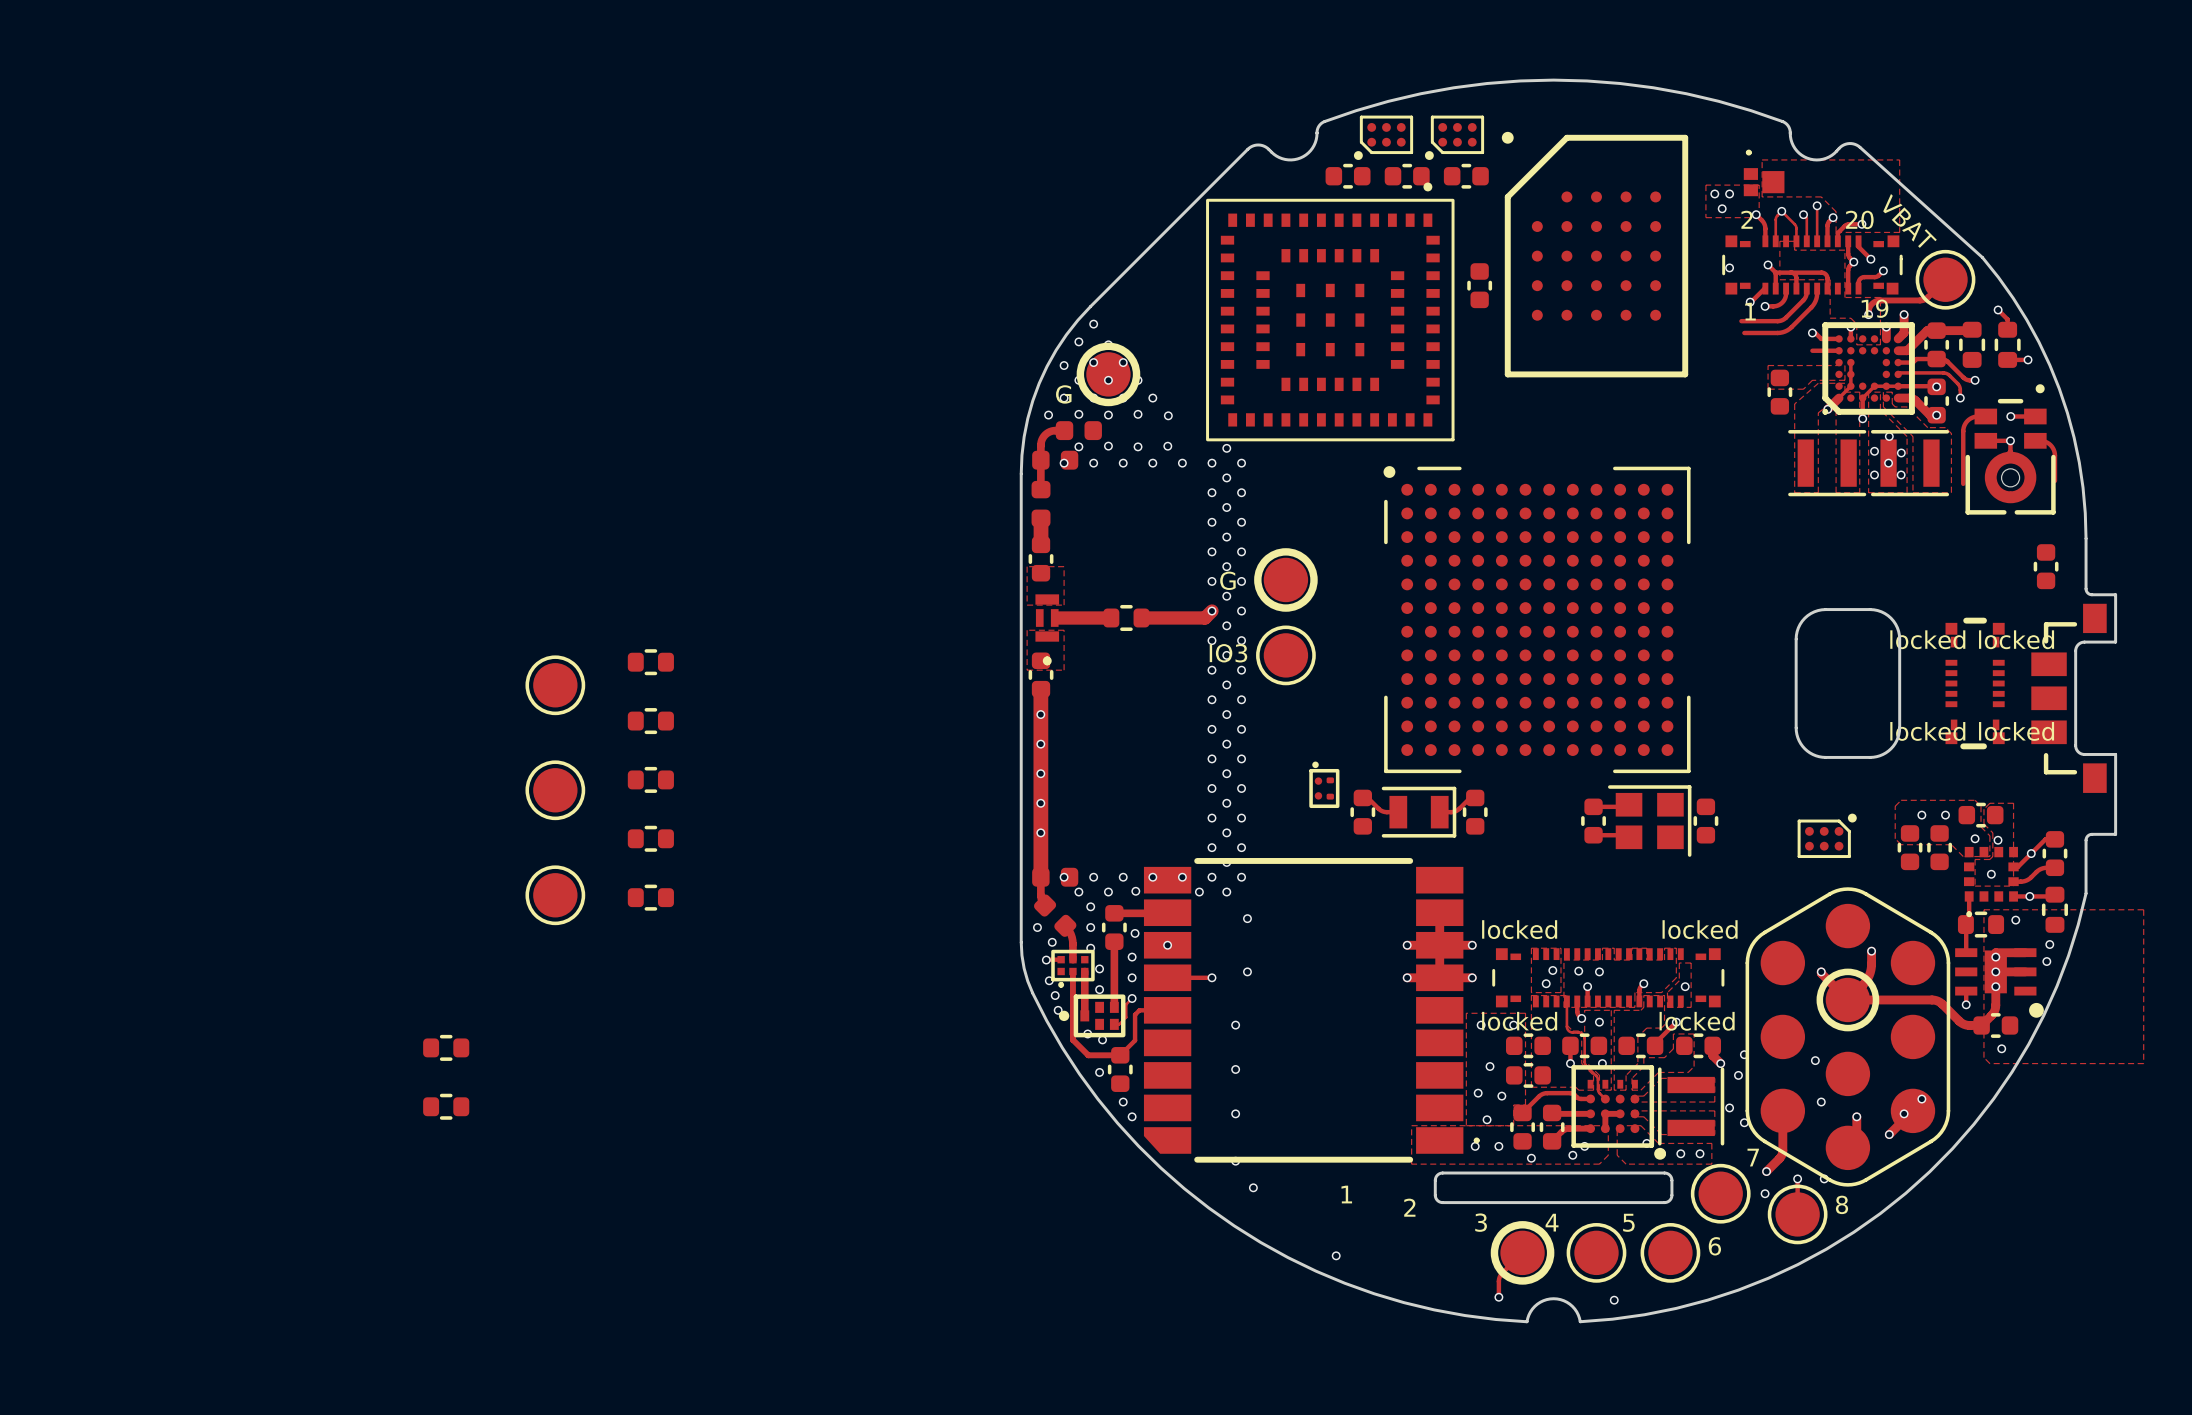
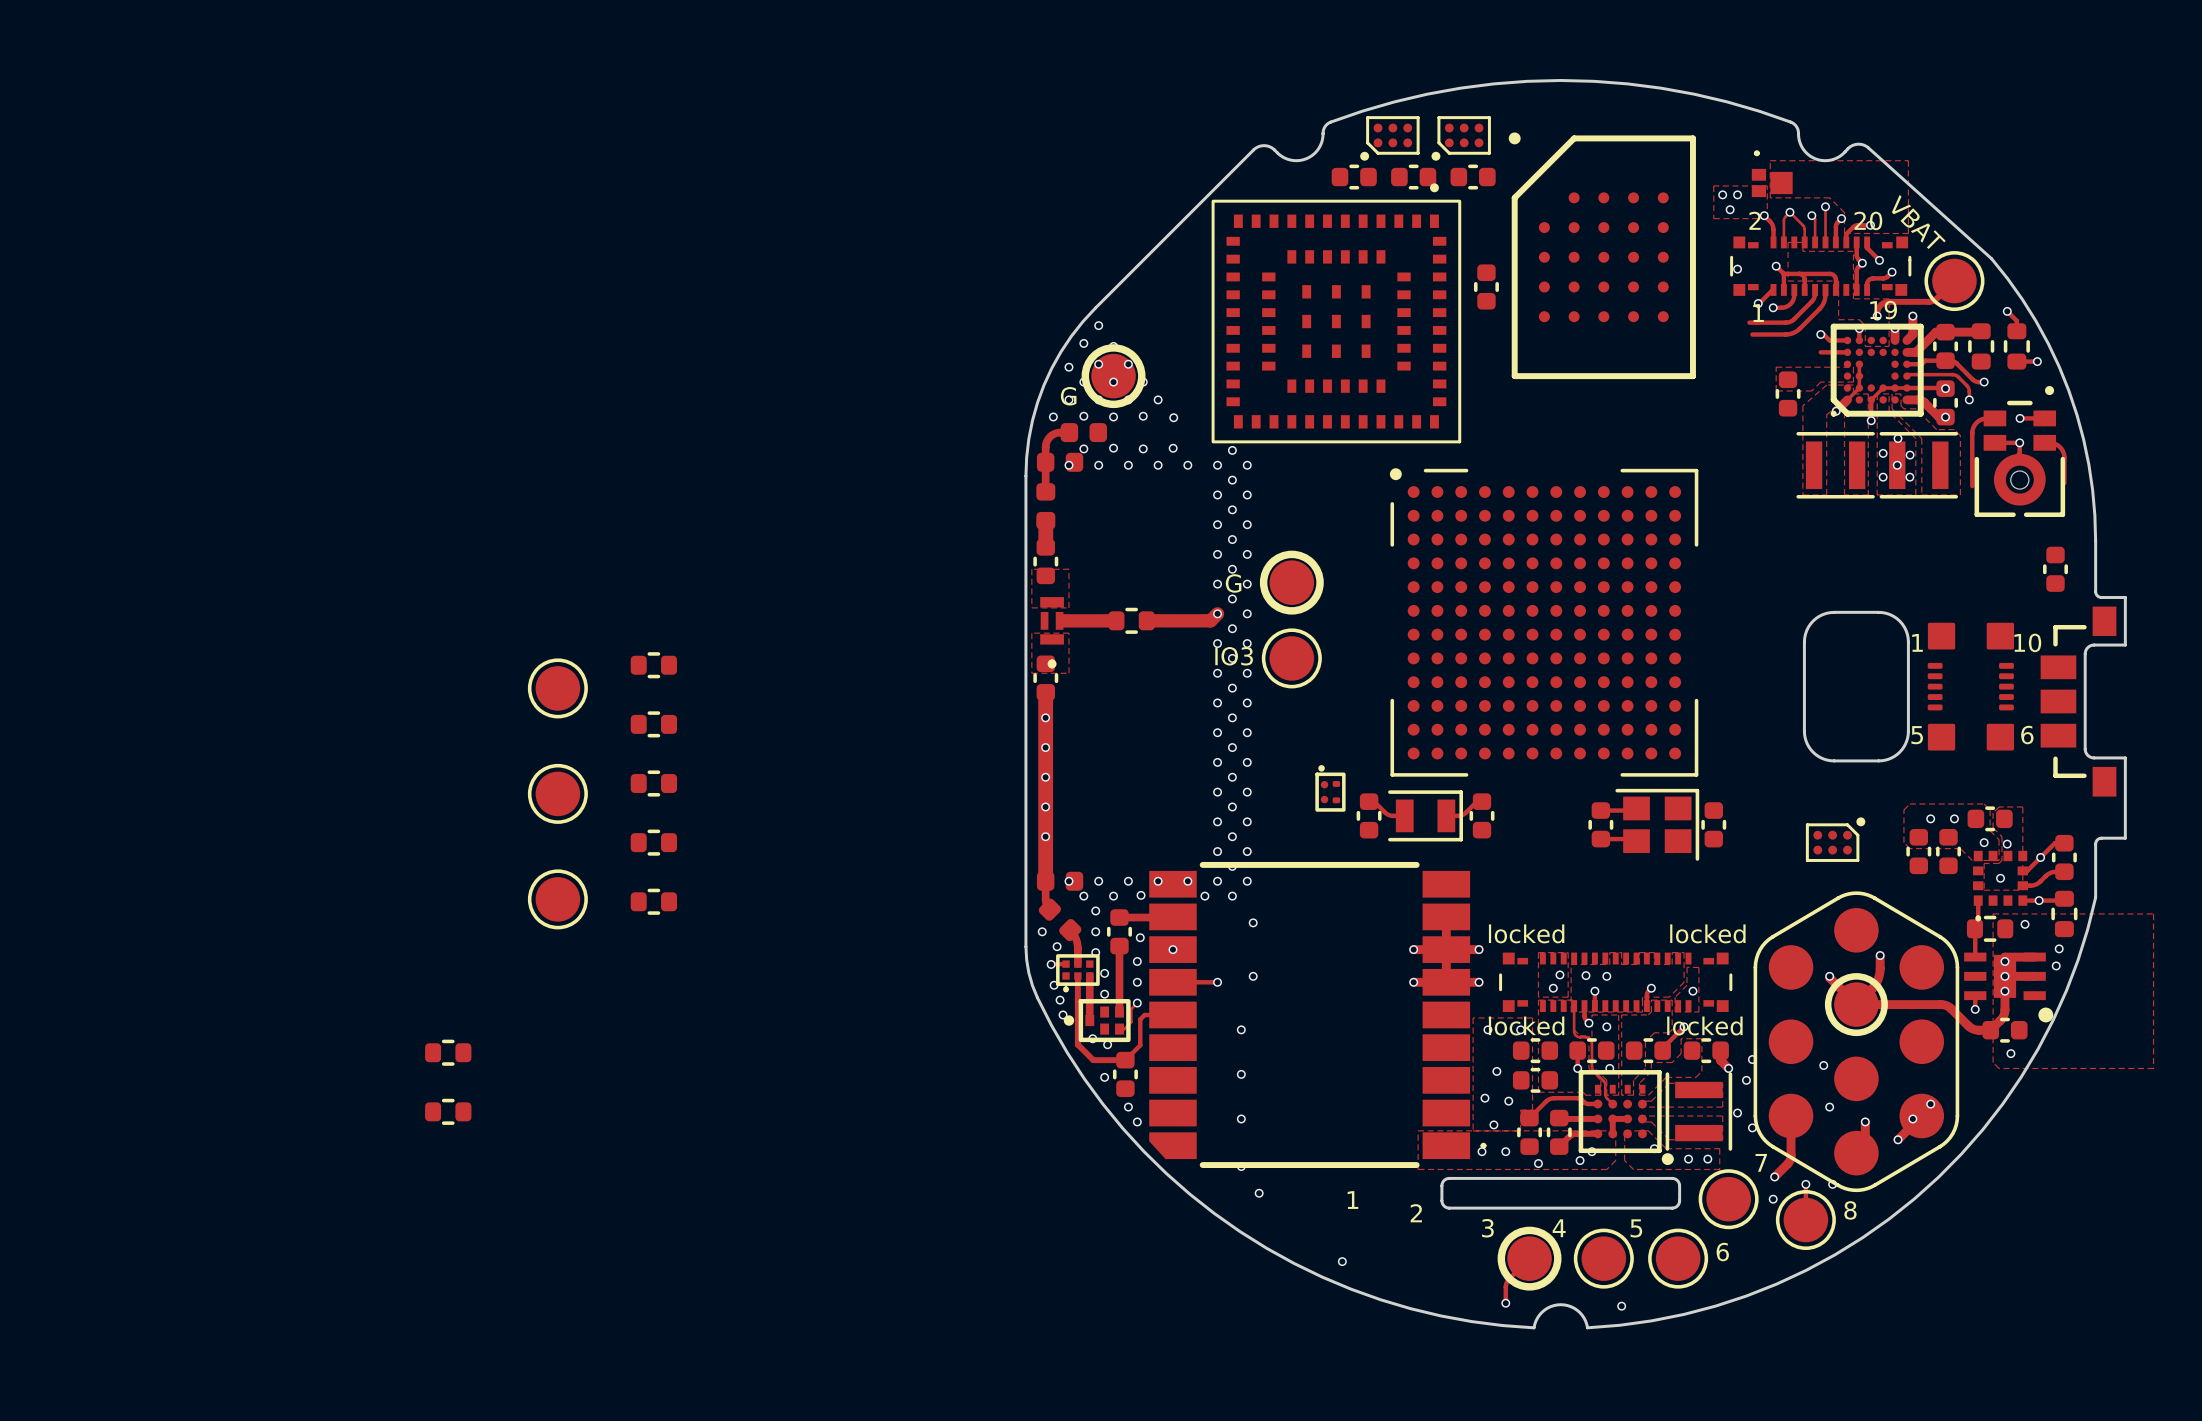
part footprint: [1945, 617, 2005, 750] -> [1927, 622, 2015, 751]
text: locked (1927, 639) -> 1 (1917, 642)
text: locked (2016, 639) -> 10 (2027, 642)
text: locked (1927, 731) -> 5 (1917, 735)
text: locked (2016, 731) -> 6 (2027, 735)

